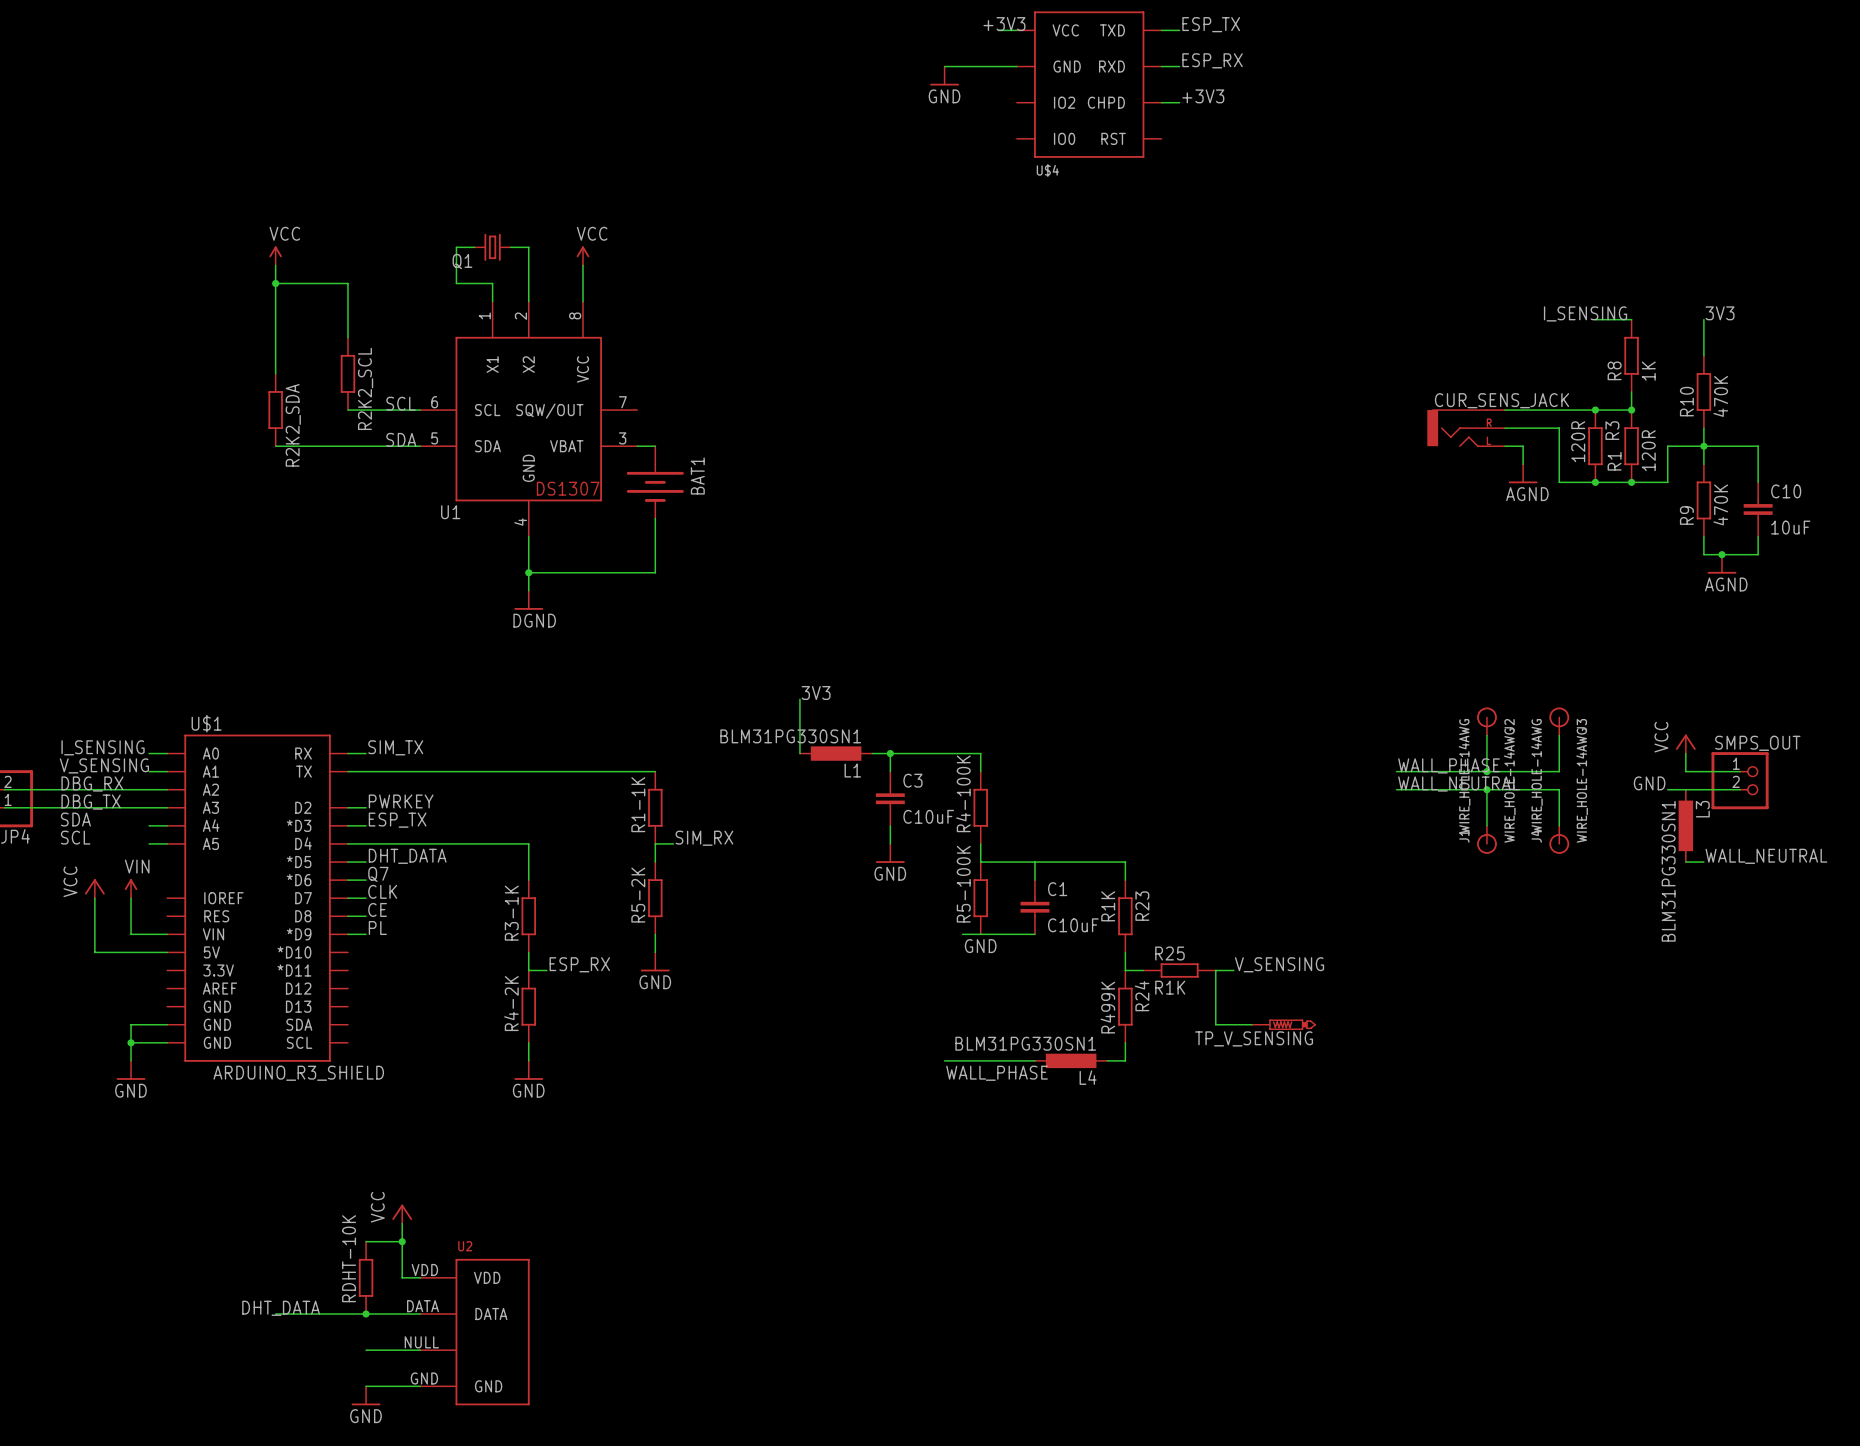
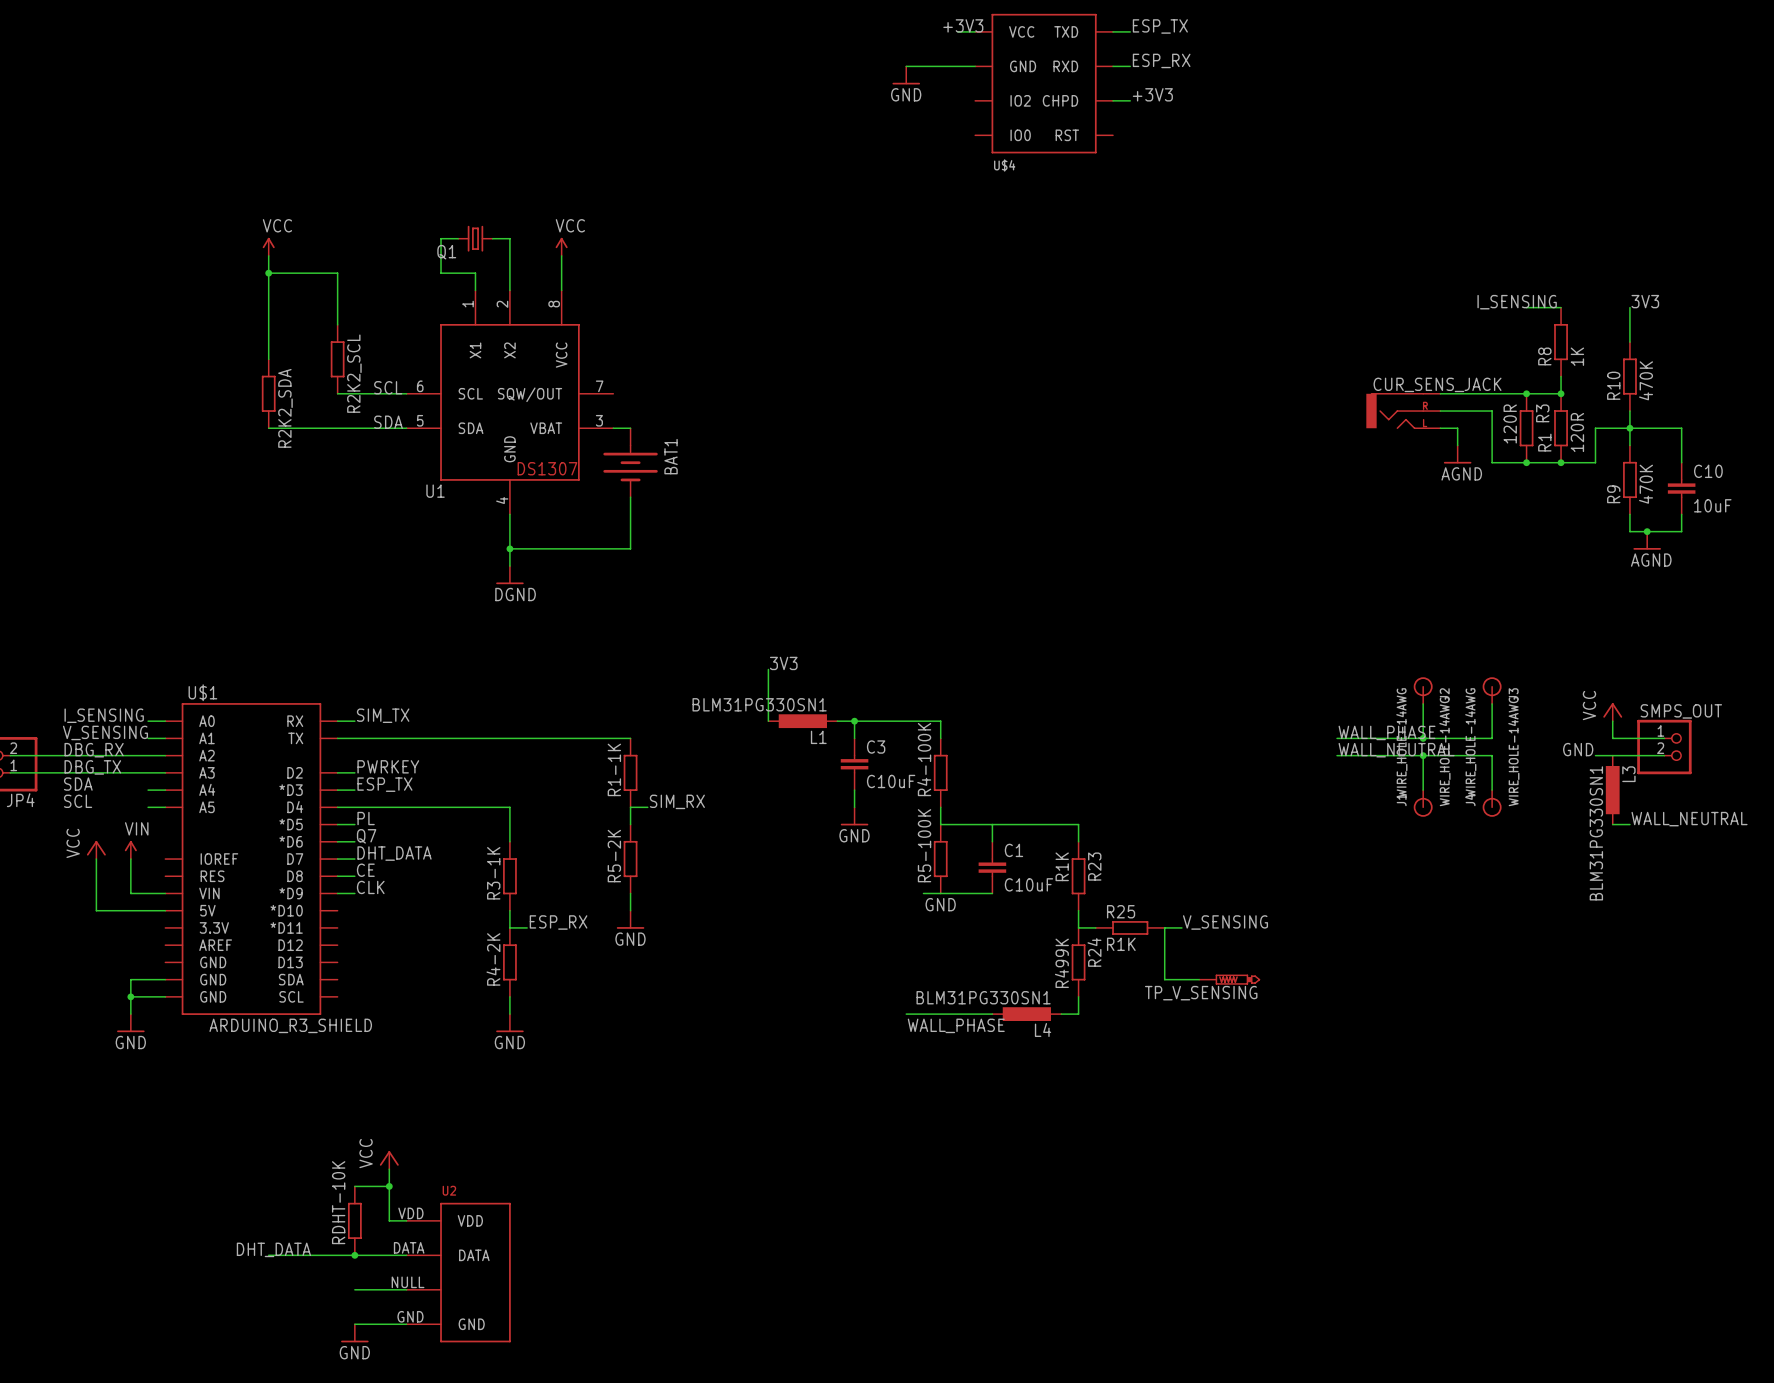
label: DHT_DATA (407, 856) -> PL (366, 818)
label: CLK (382, 891) -> DHT_DATA (394, 853)
label: PL (377, 928) -> CLK (370, 887)

